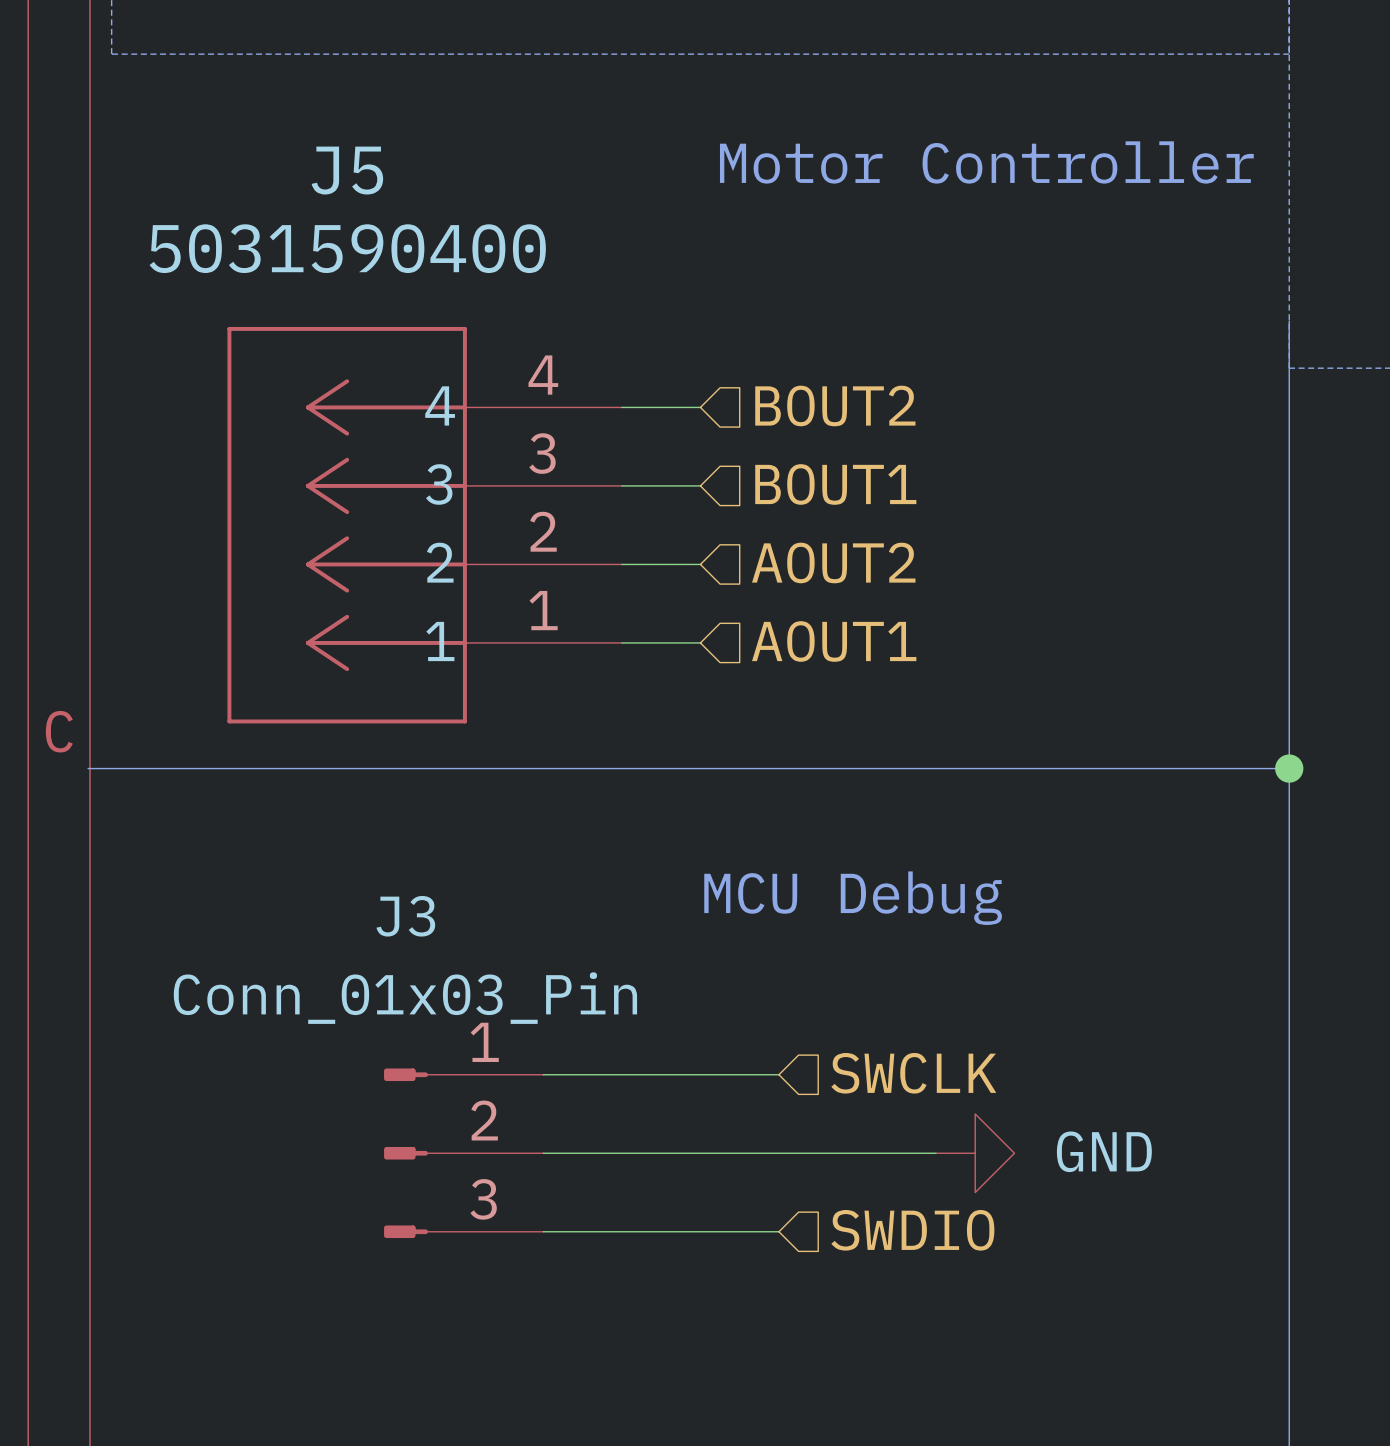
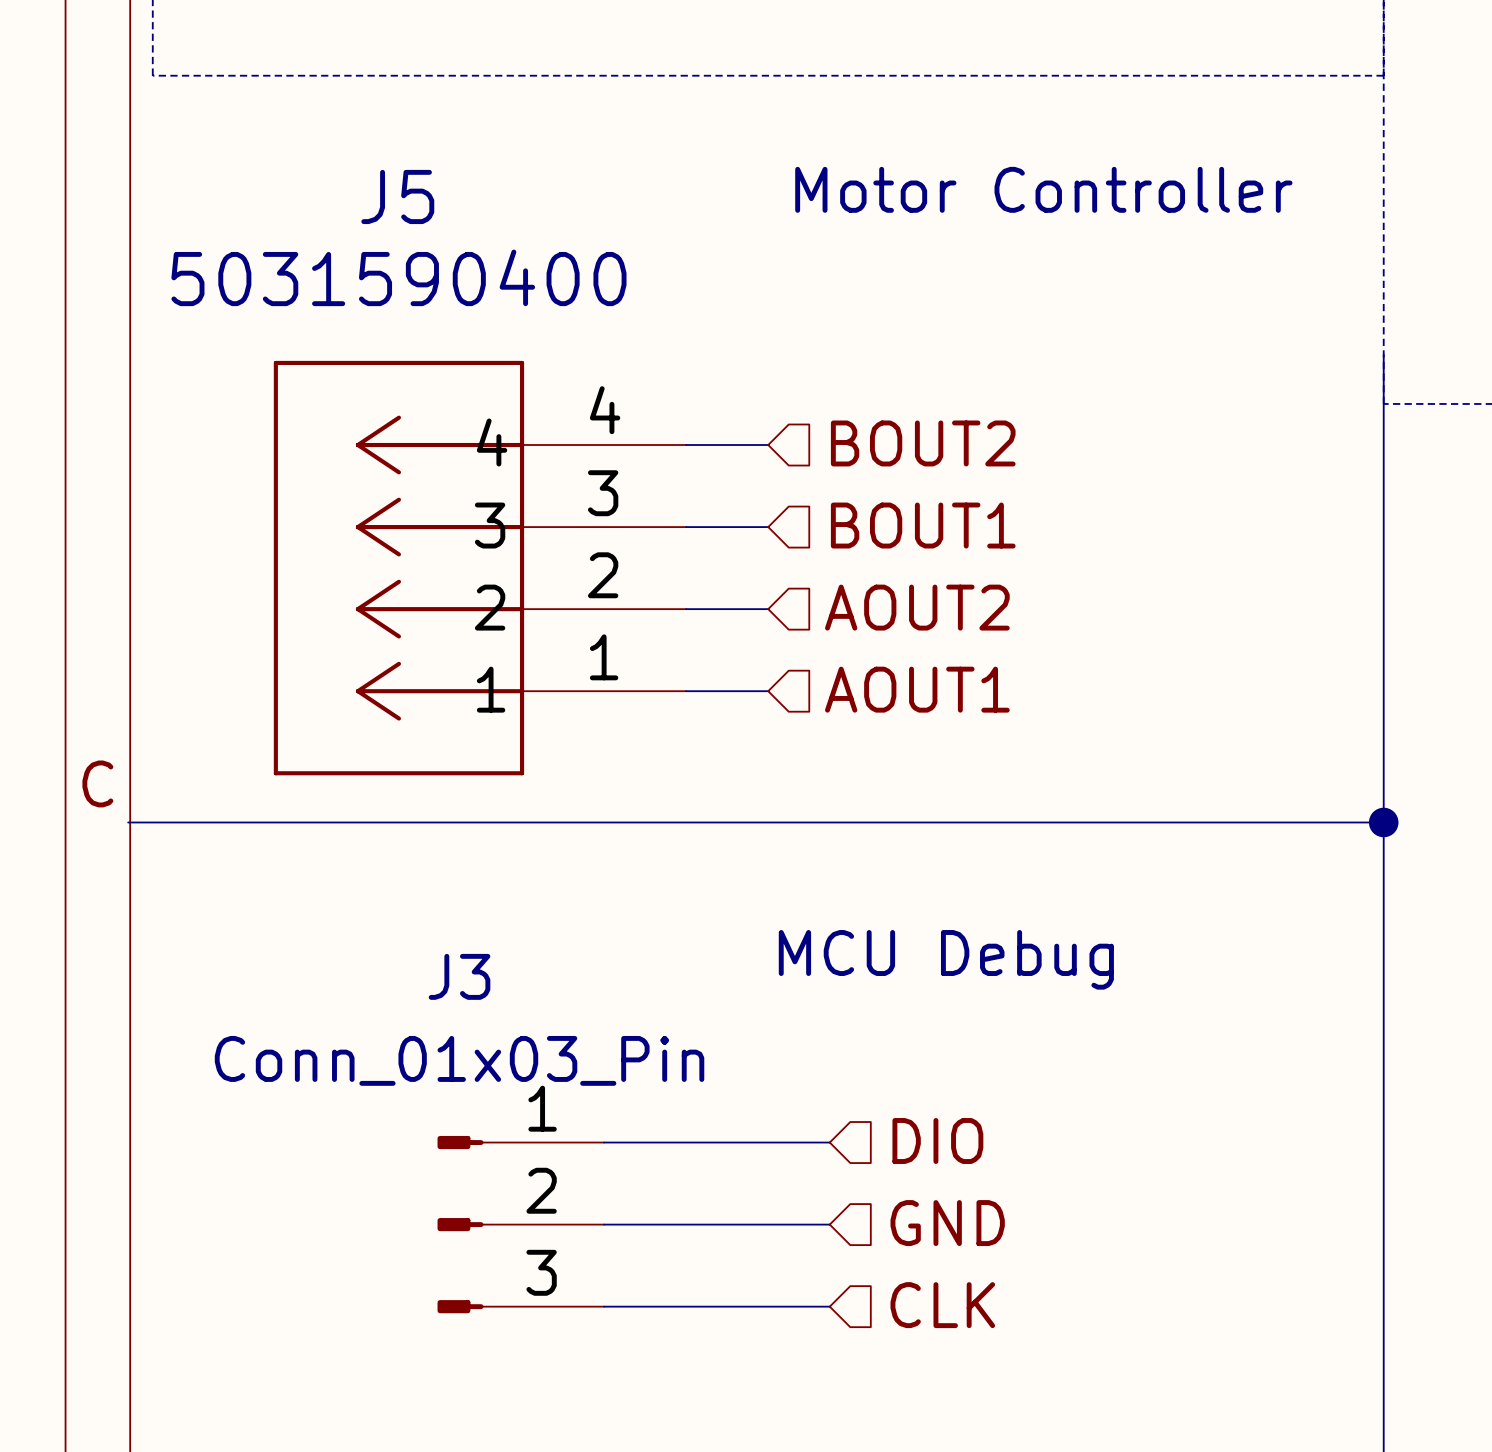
hierarchical label: SWCLK (913, 1073) -> DIO (937, 1141)
wire: (759, 1074) (778, 1074) -> none
hierarchical label: none -> GND (947, 1223)
wire: (759, 1153) (935, 1153) -> none
power symbol: GND (975, 1153) -> none
hierarchical label: SWDIO (912, 1230) -> CLK (942, 1305)
wire: (759, 1231) (778, 1231) -> none

